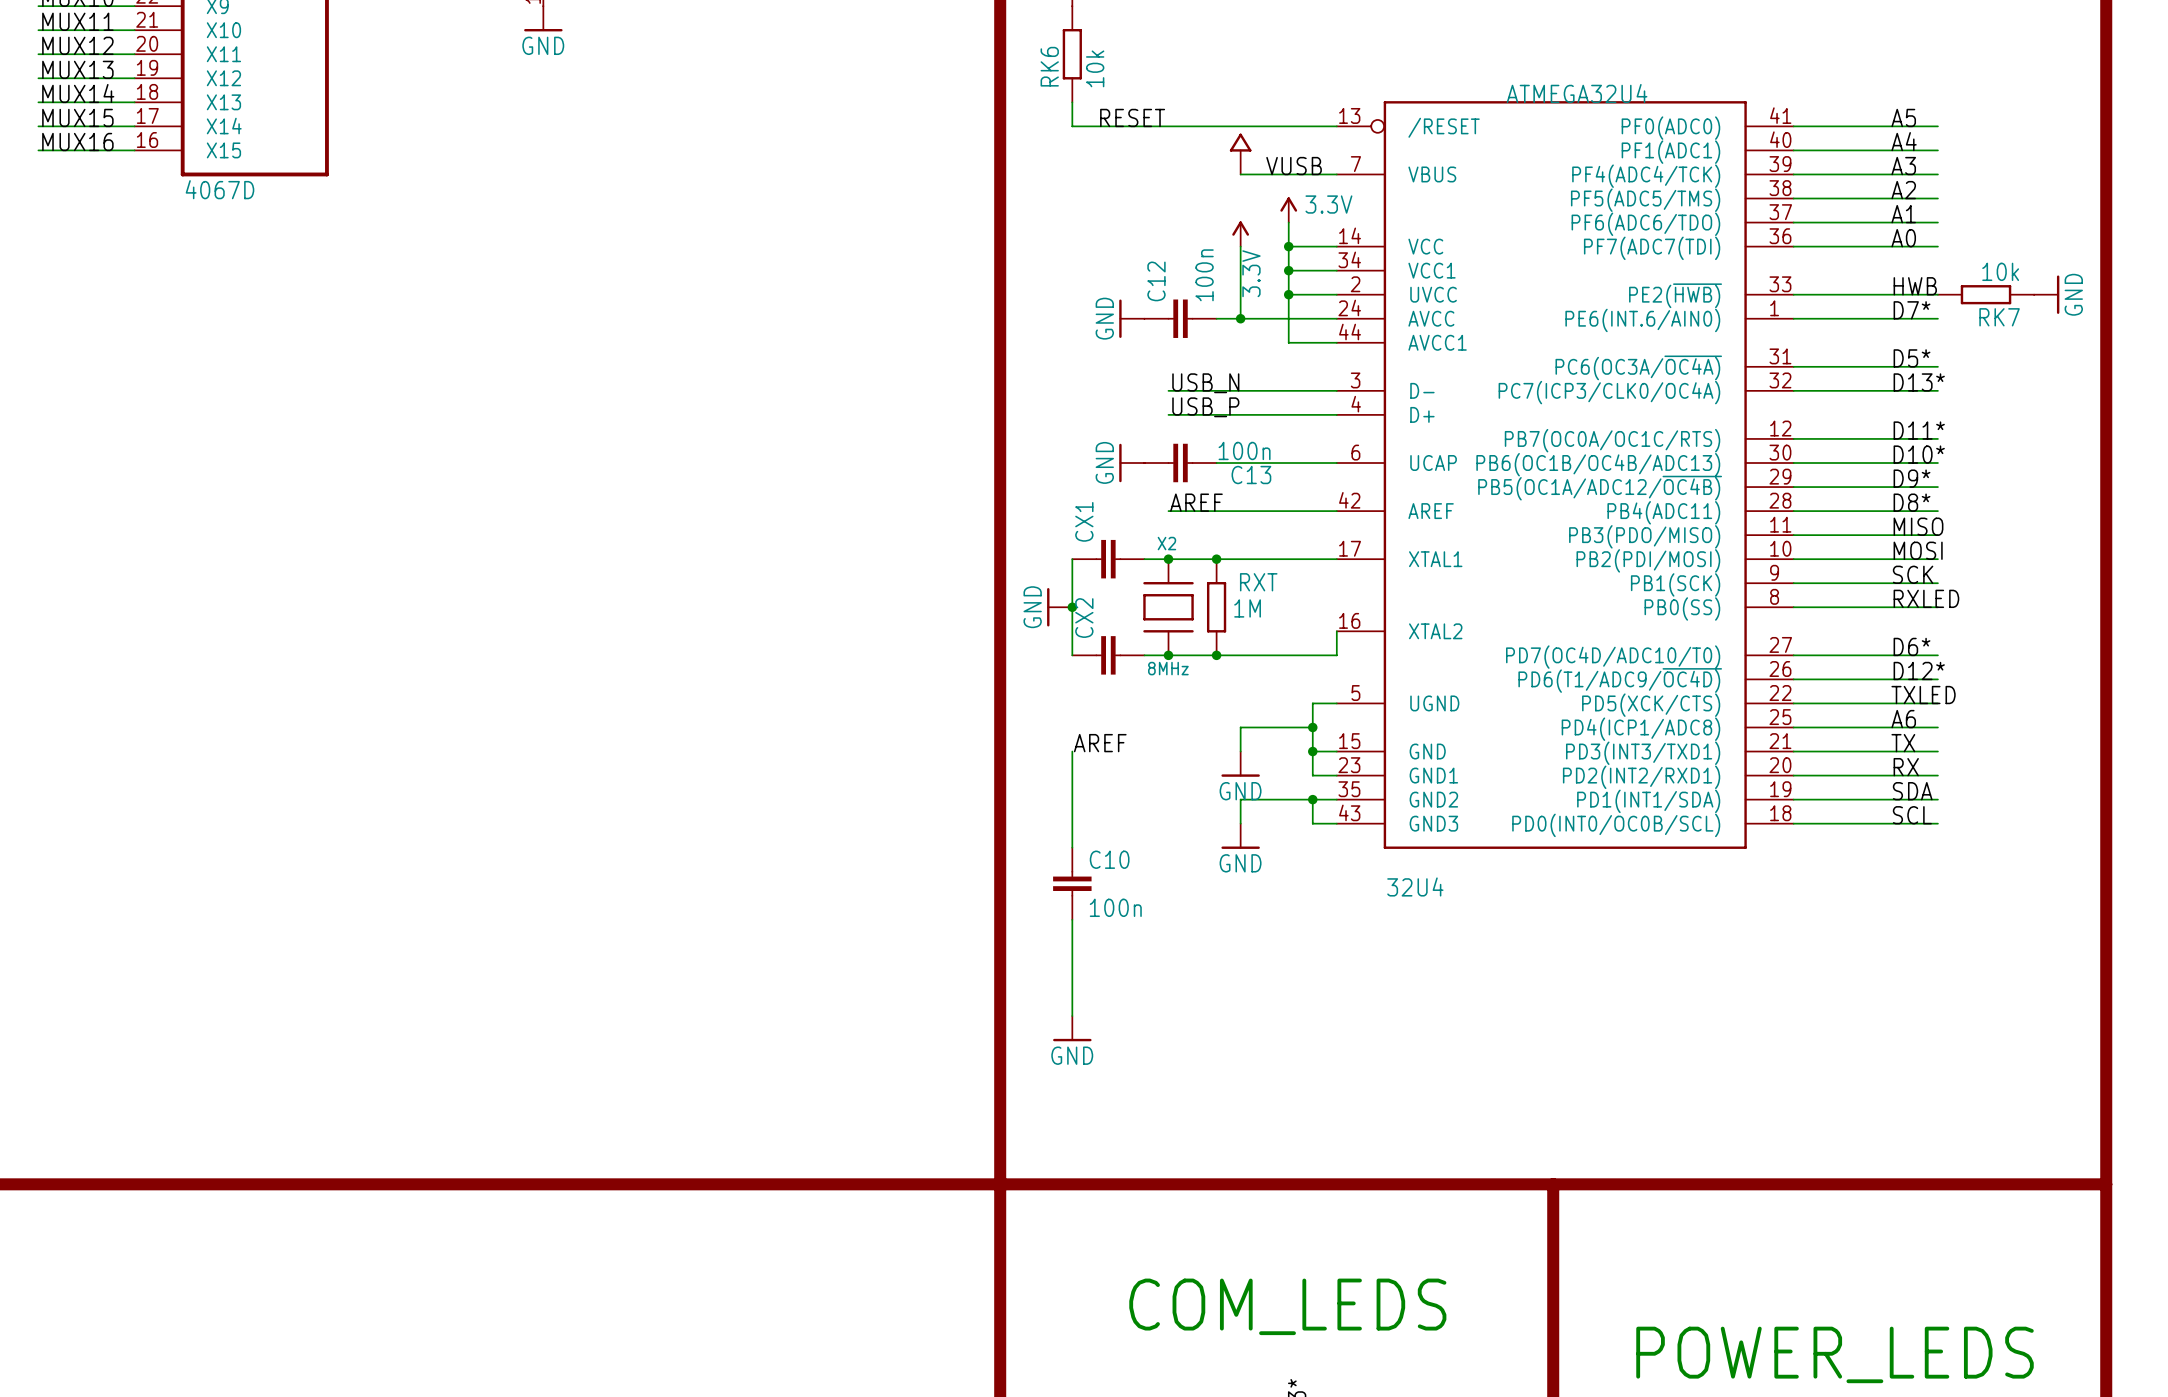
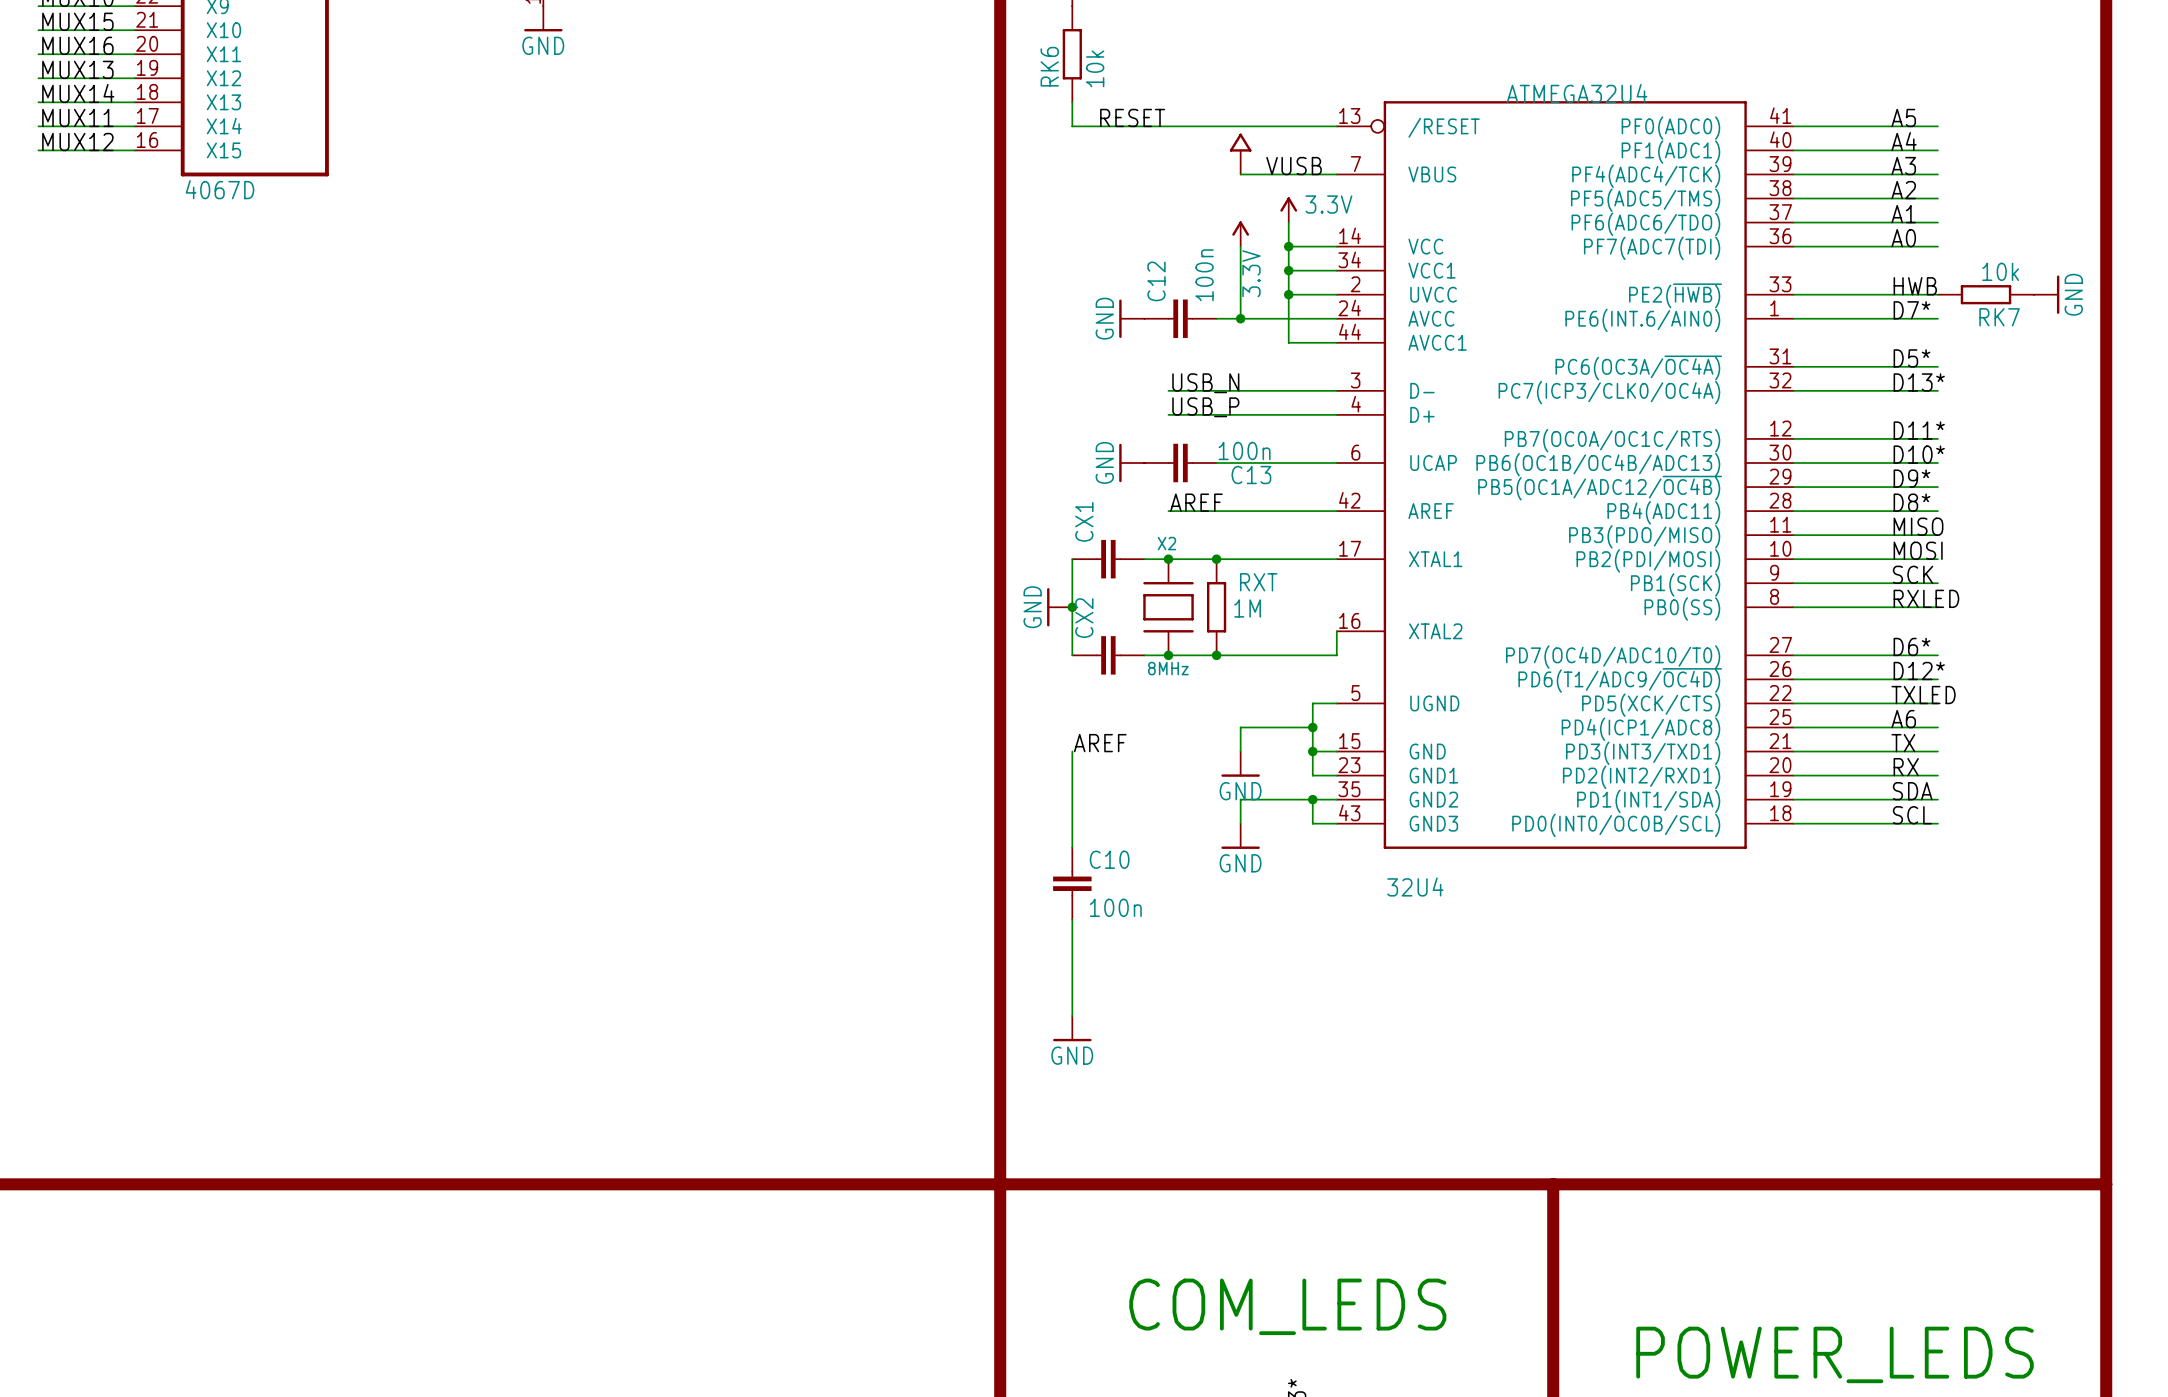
label: MUX11 (77, 21) -> MUX15 (77, 21)
label: MUX12 (77, 45) -> MUX16 (77, 45)
label: MUX15 (77, 117) -> MUX11 (77, 117)
label: MUX16 (77, 142) -> MUX12 (77, 142)

